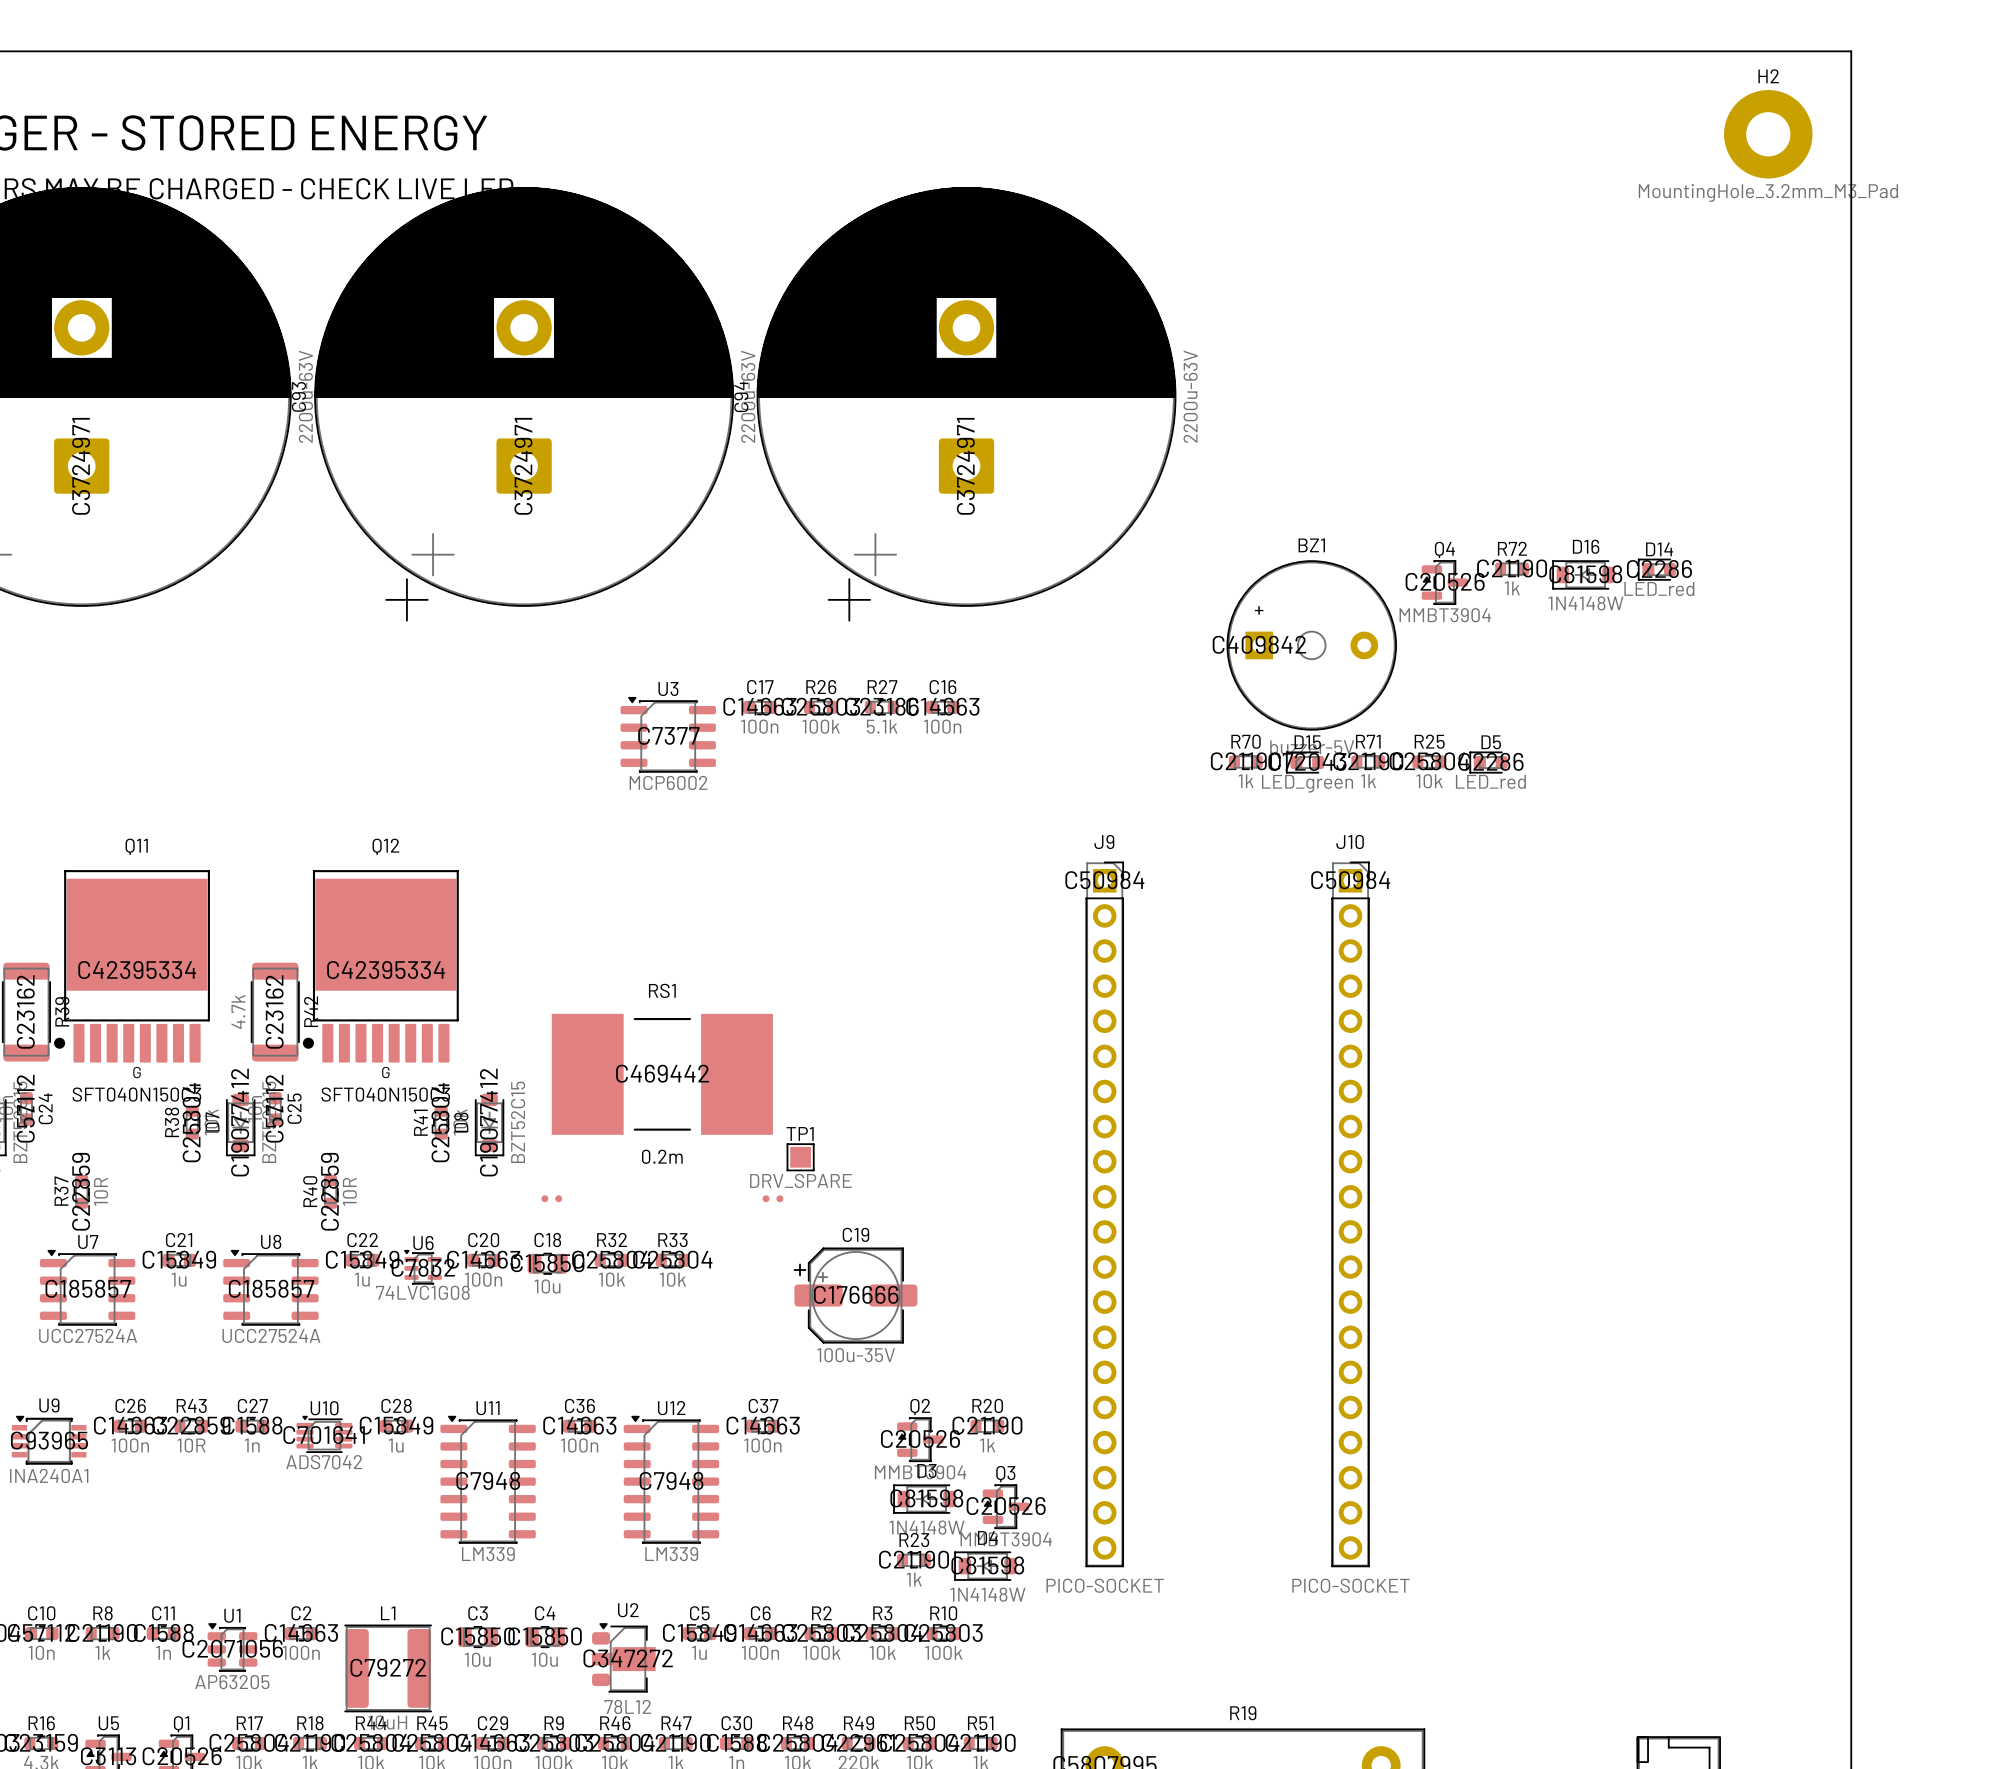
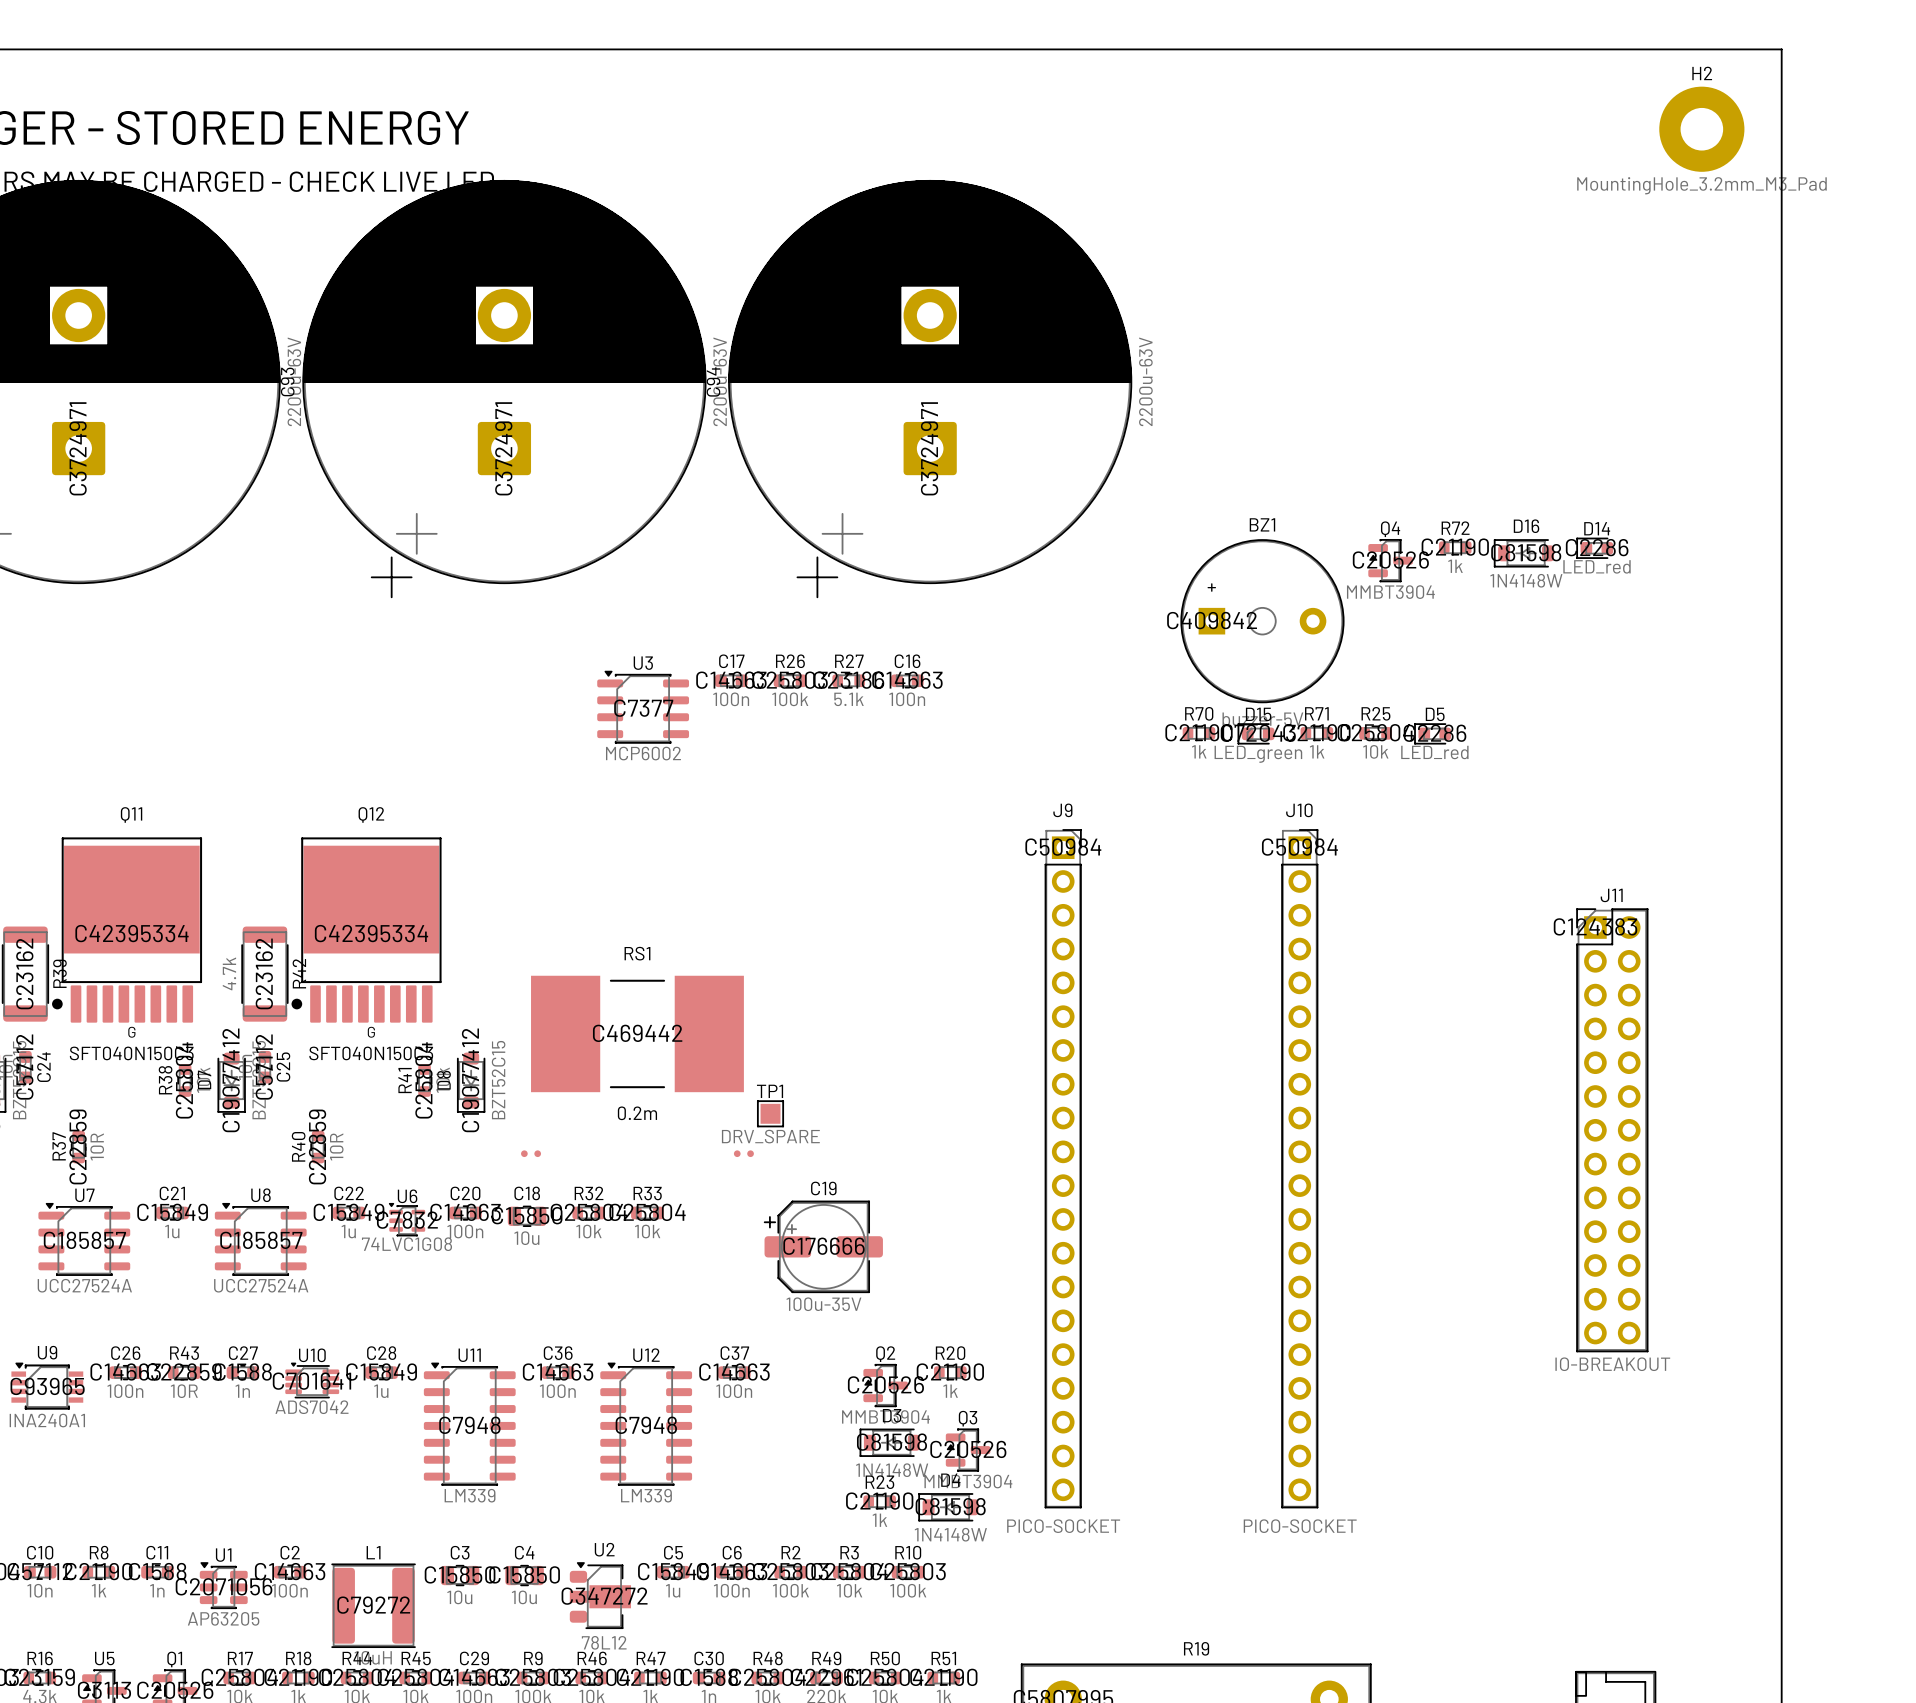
J11: none -> IO-BREAKOUT (1612, 1130)

